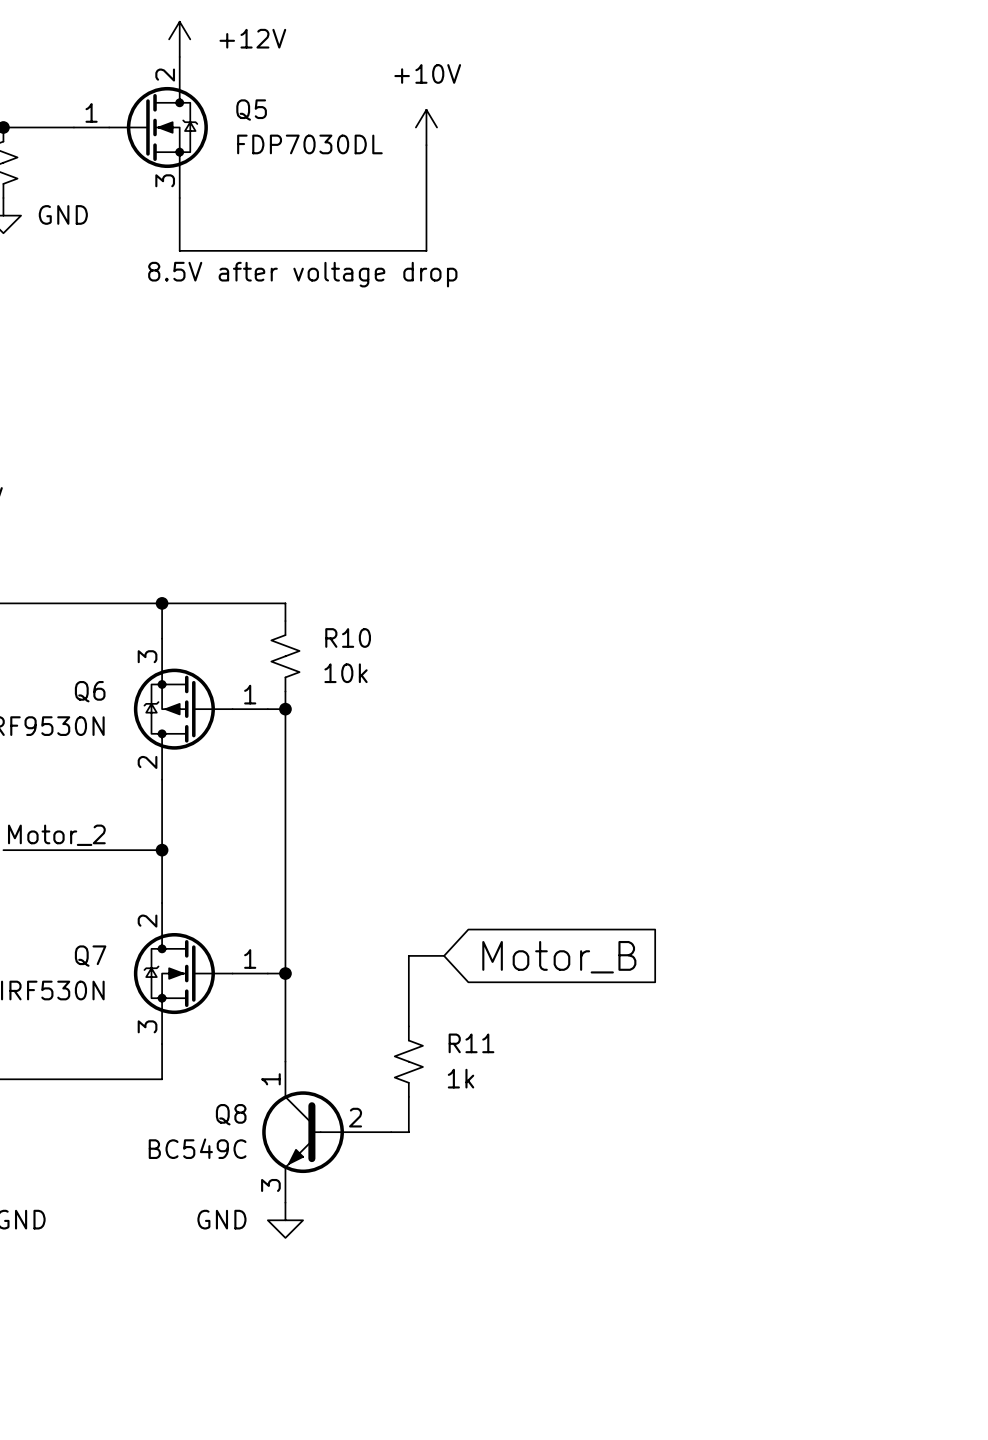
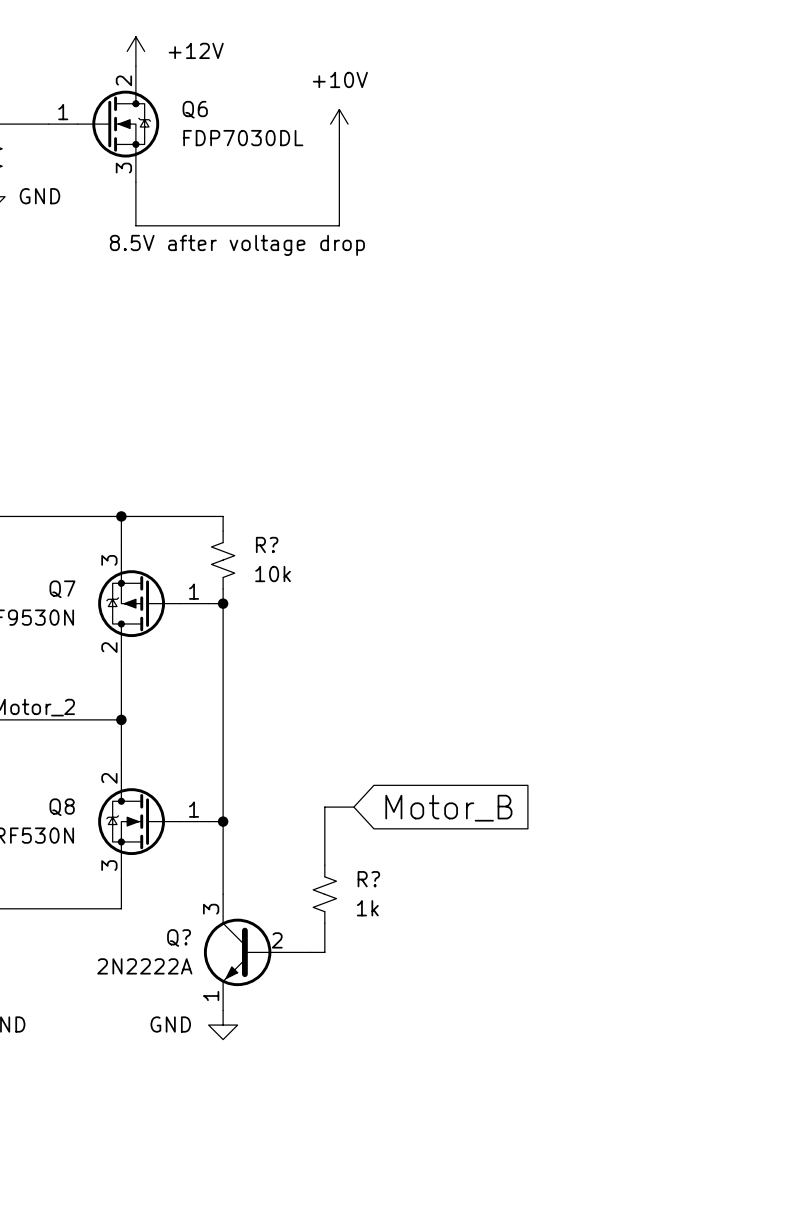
Q5 name: Q5 (251, 110) -> Q6 (195, 109)
R10 name: R10 (348, 637) -> R? (267, 544)
Q6 name: Q6 (90, 691) -> Q7 (62, 589)
Q7 name: Q7 (90, 956) -> Q8 (62, 807)
R11 name: R11 (471, 1043) -> R? (368, 879)
Q8: BC549C (326, 1132) -> none
Q?: none -> 2N2222A (257, 952)

